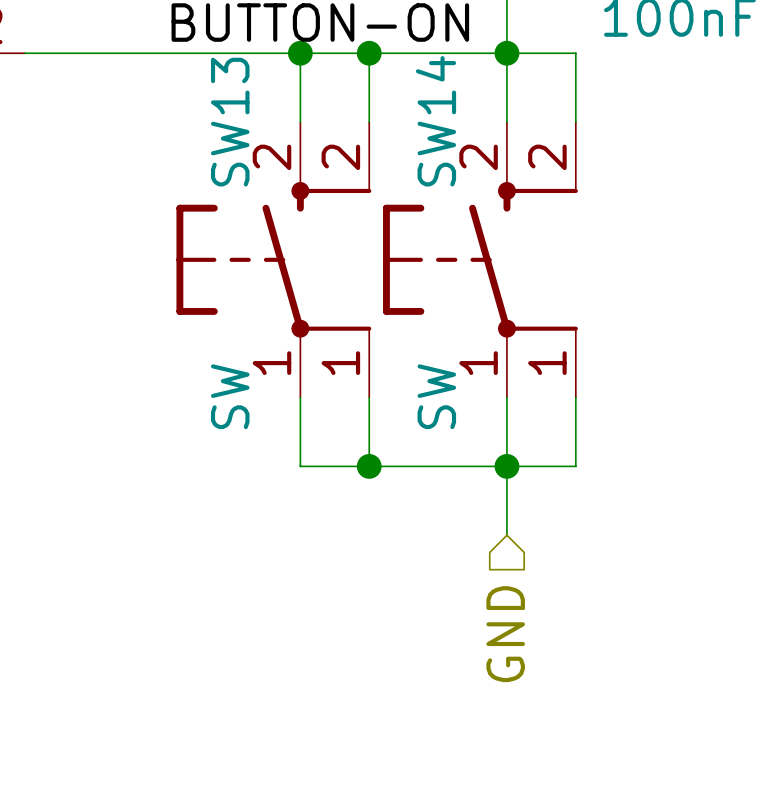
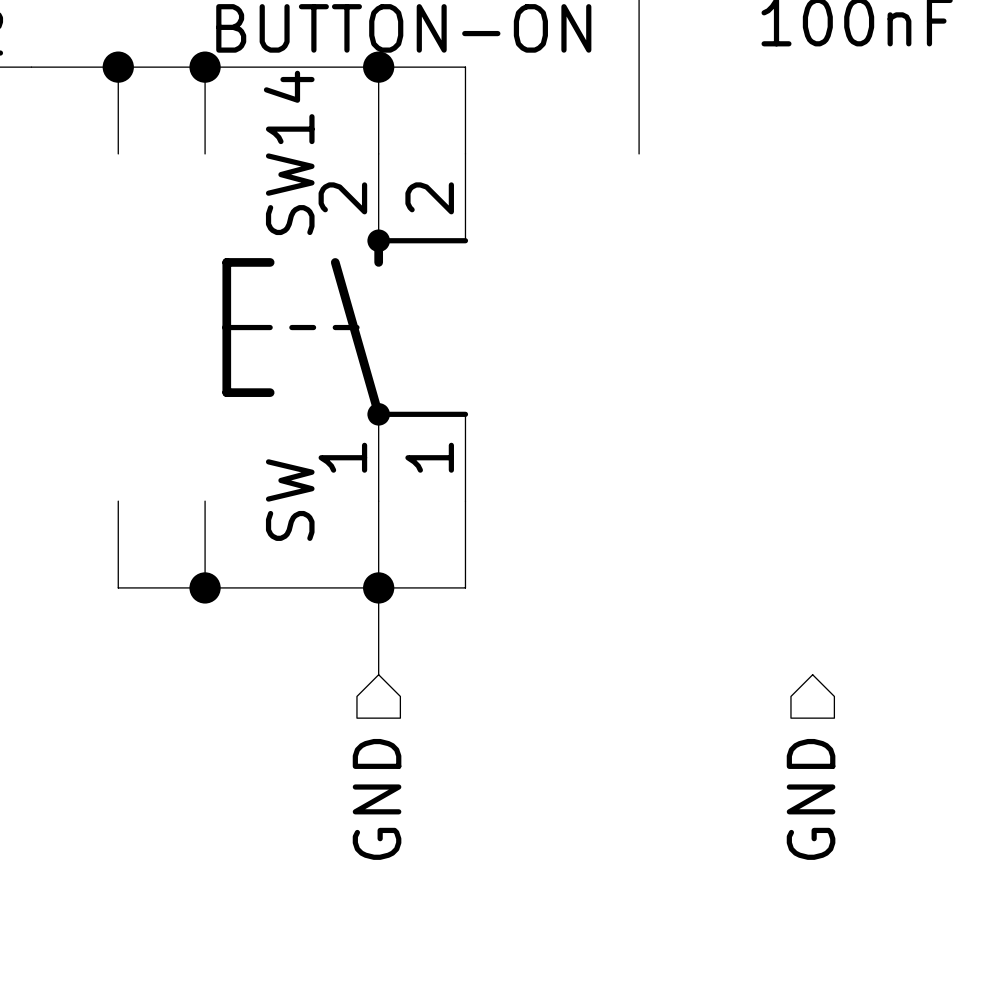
wire: none -> (118, 67) (118, 153)
junction: none -> (118, 67)
wire: none -> (205, 67) (205, 153)
junction: none -> (205, 67)
wire: (369, 53) (575, 53) (575, 122) -> none
junction: (369, 53) -> none
junction: (506, 53) -> none
SW13 name: SW13 (230, 122) -> SW14 (289, 152)
SW14: SW (480, 259) -> none
wire: none -> (118, 501) (118, 587) (378, 587) (378, 674)
wire: none -> (205, 501) (205, 587)
wire: (506, 397) (506, 535) -> none
wire: (575, 397) (575, 466) (369, 466) -> none
junction: none -> (205, 587)
junction position: (369, 466) -> (378, 587)
junction: (506, 466) -> none
hierarchical label: none -> GND (377, 799)
hierarchical label: GND (505, 634) -> none
hierarchical label: none -> GND (811, 799)

